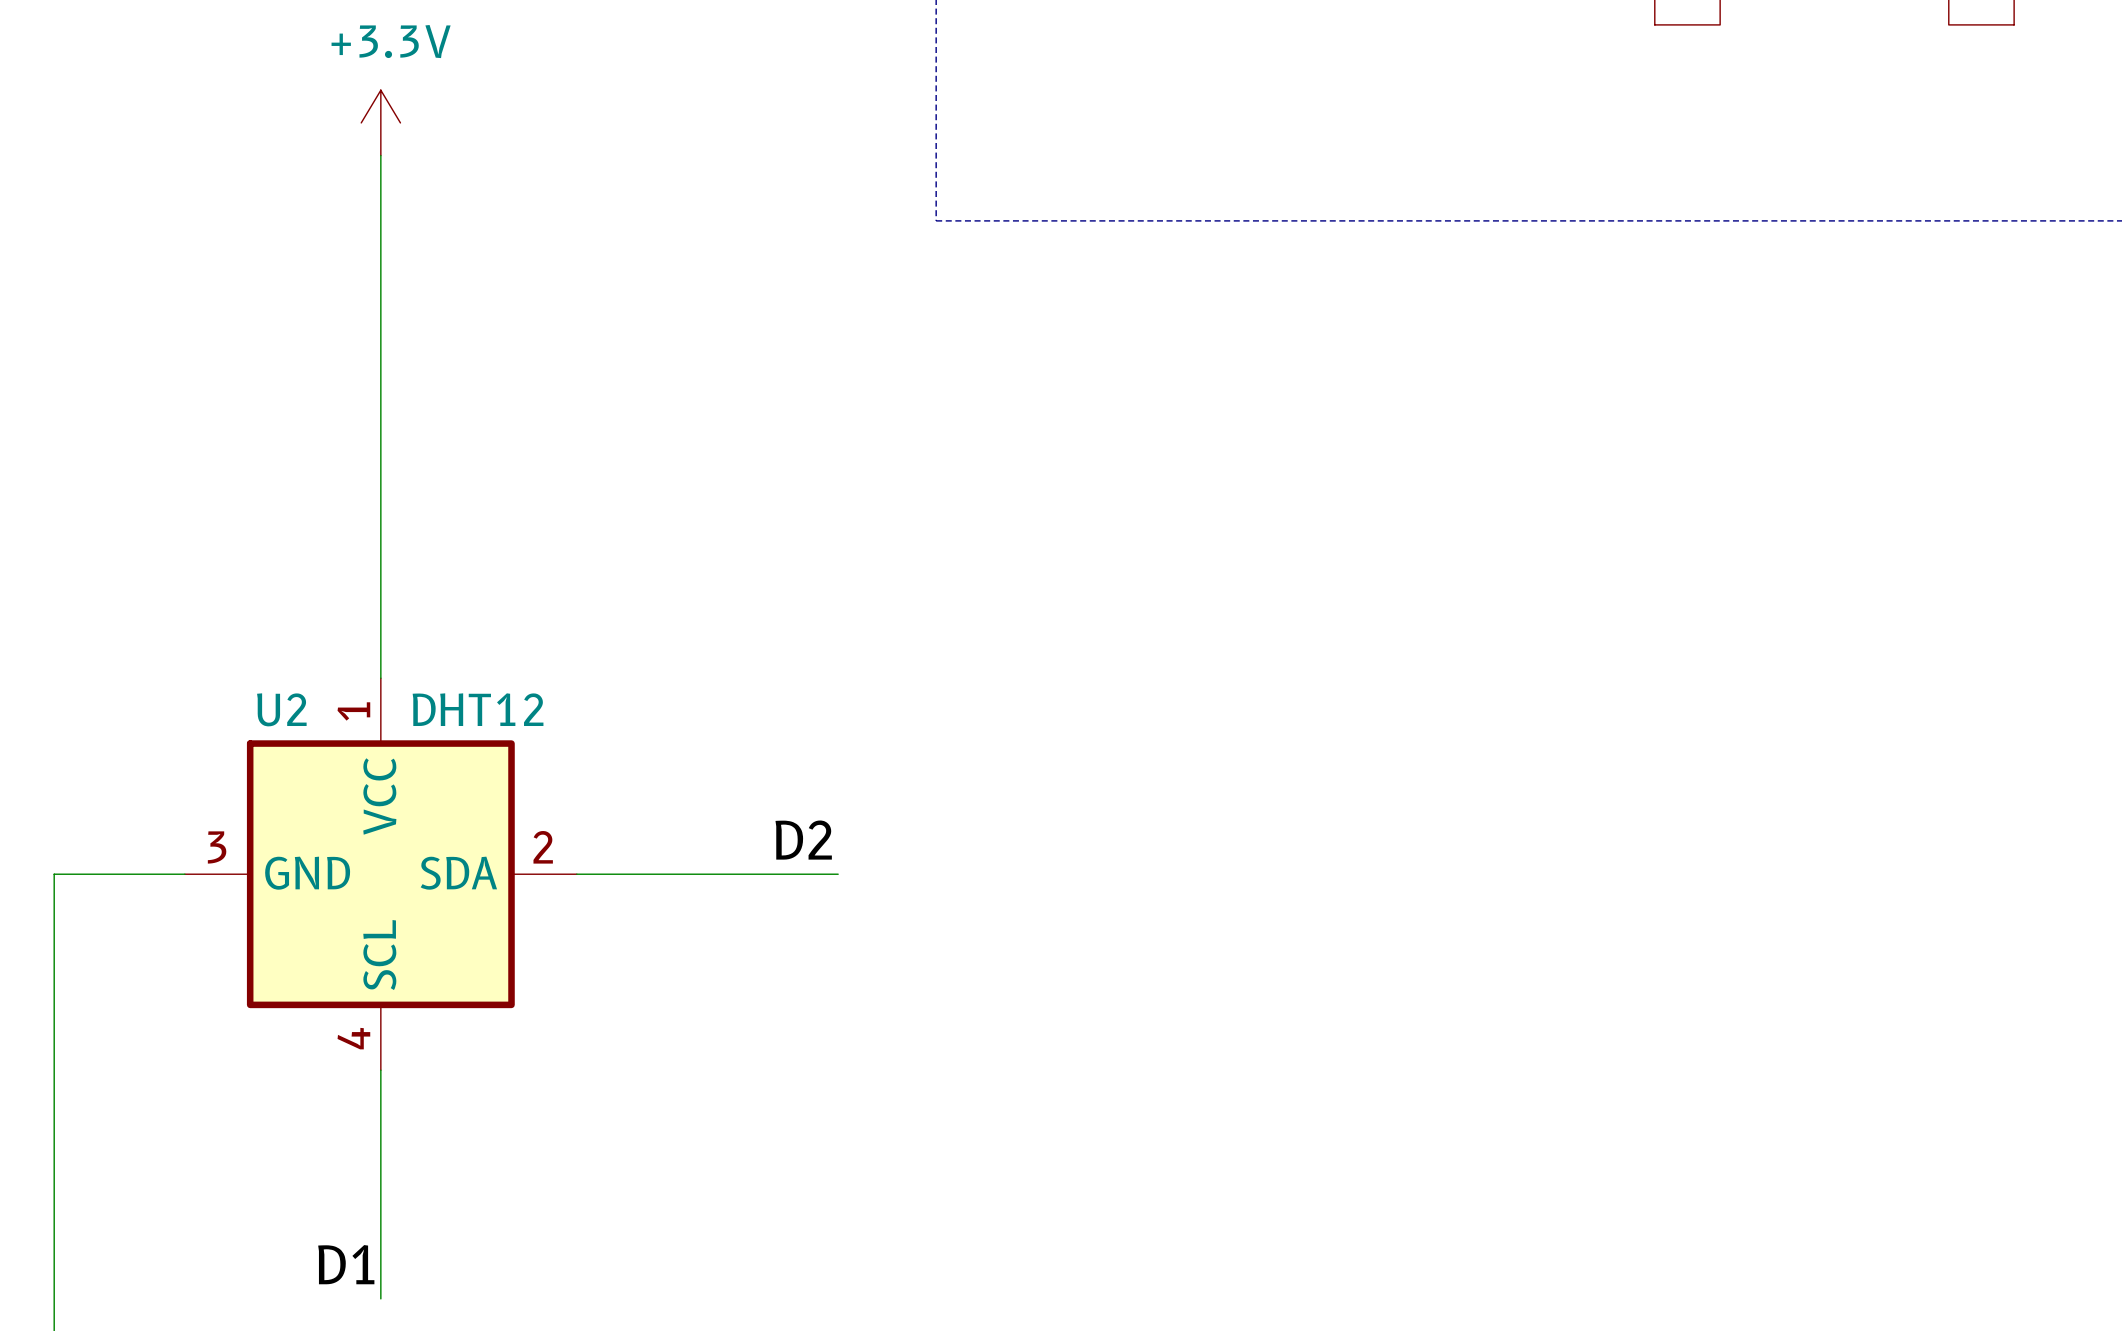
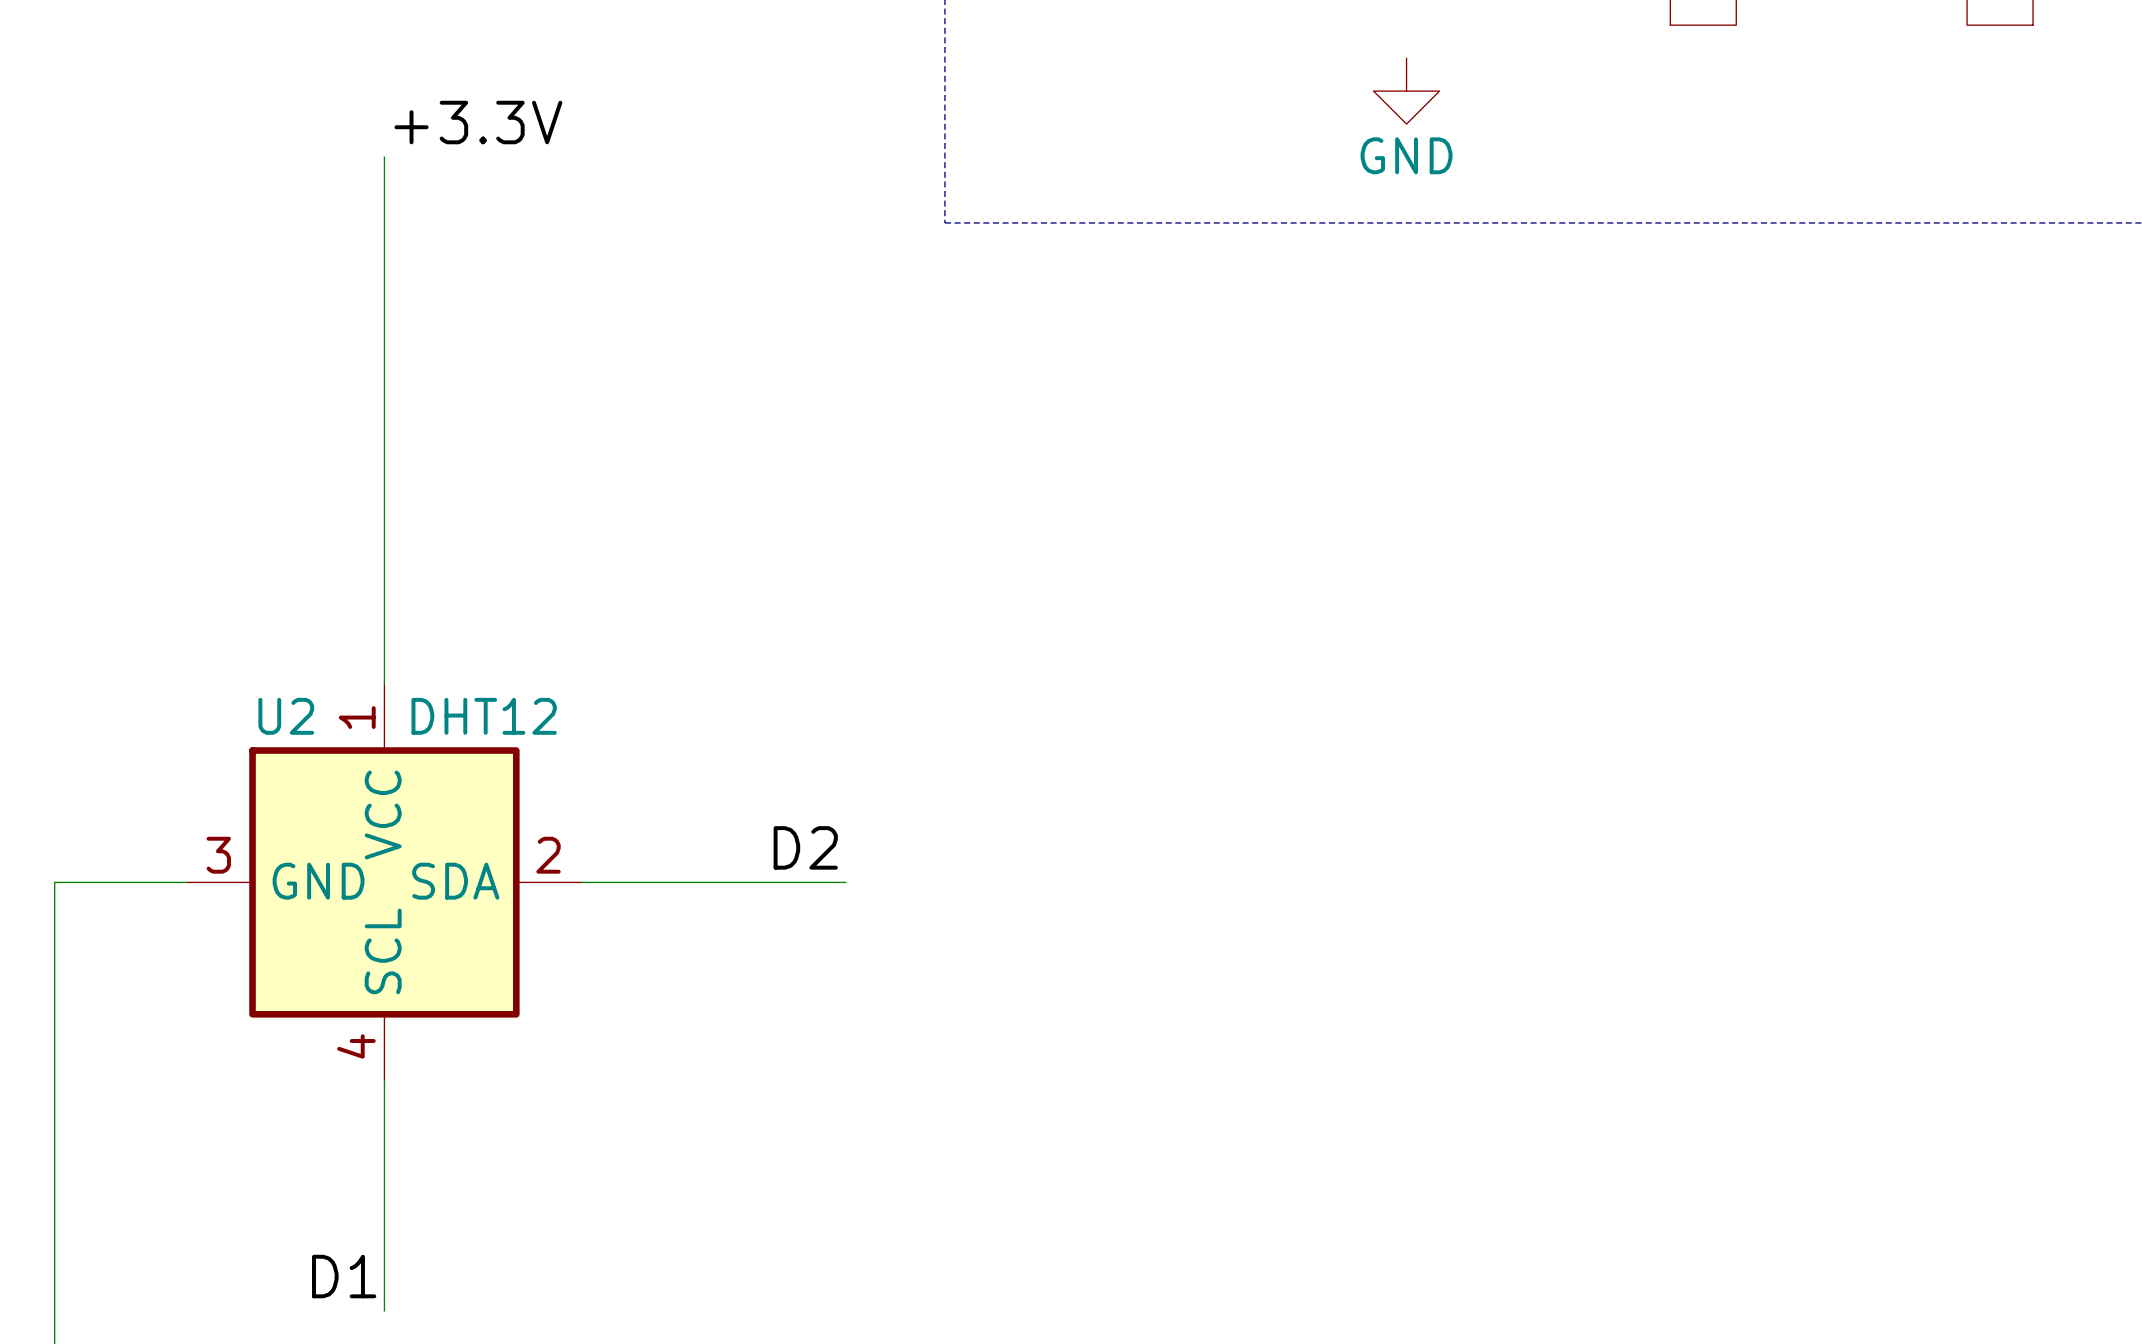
power symbol: none -> GND (1406, 91)
label: none -> +3.3V (478, 122)
power symbol: +3.3V (380, 122) -> none

